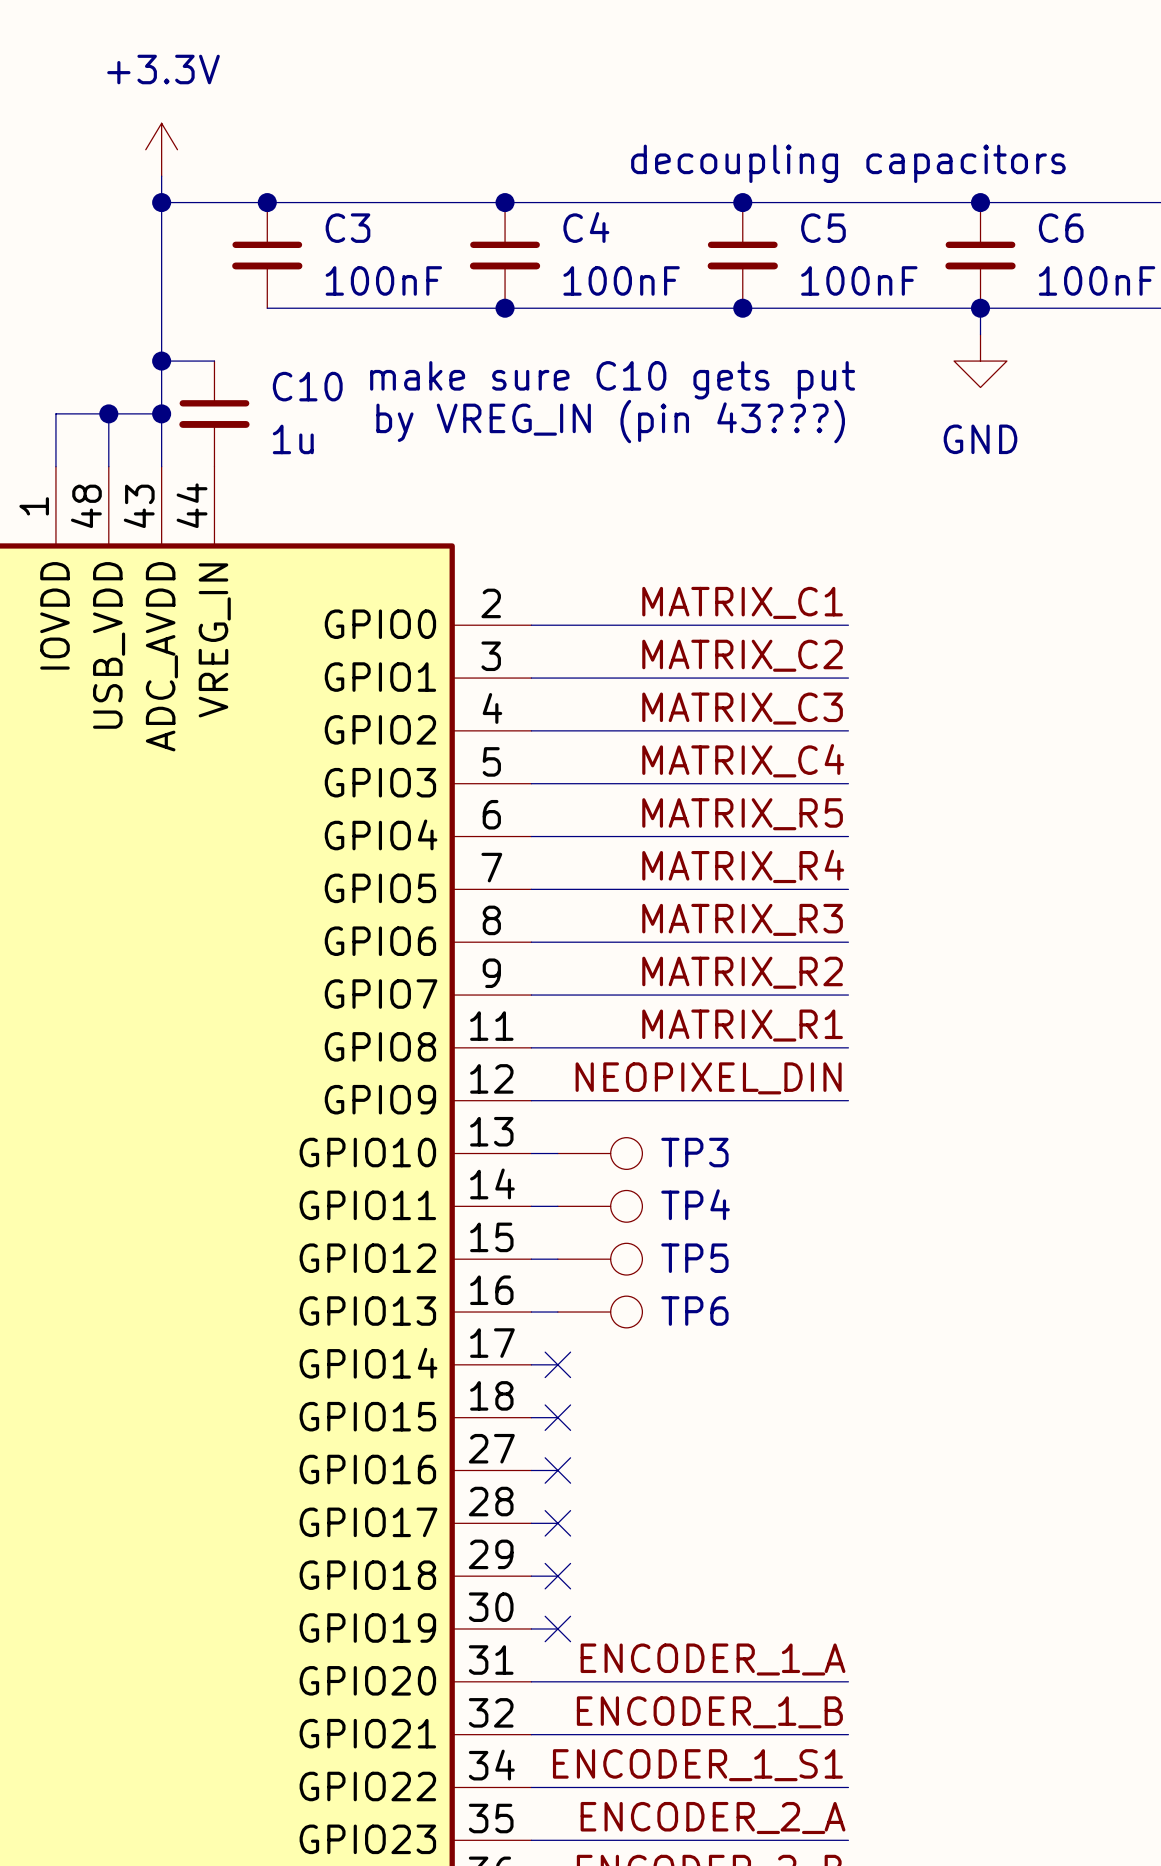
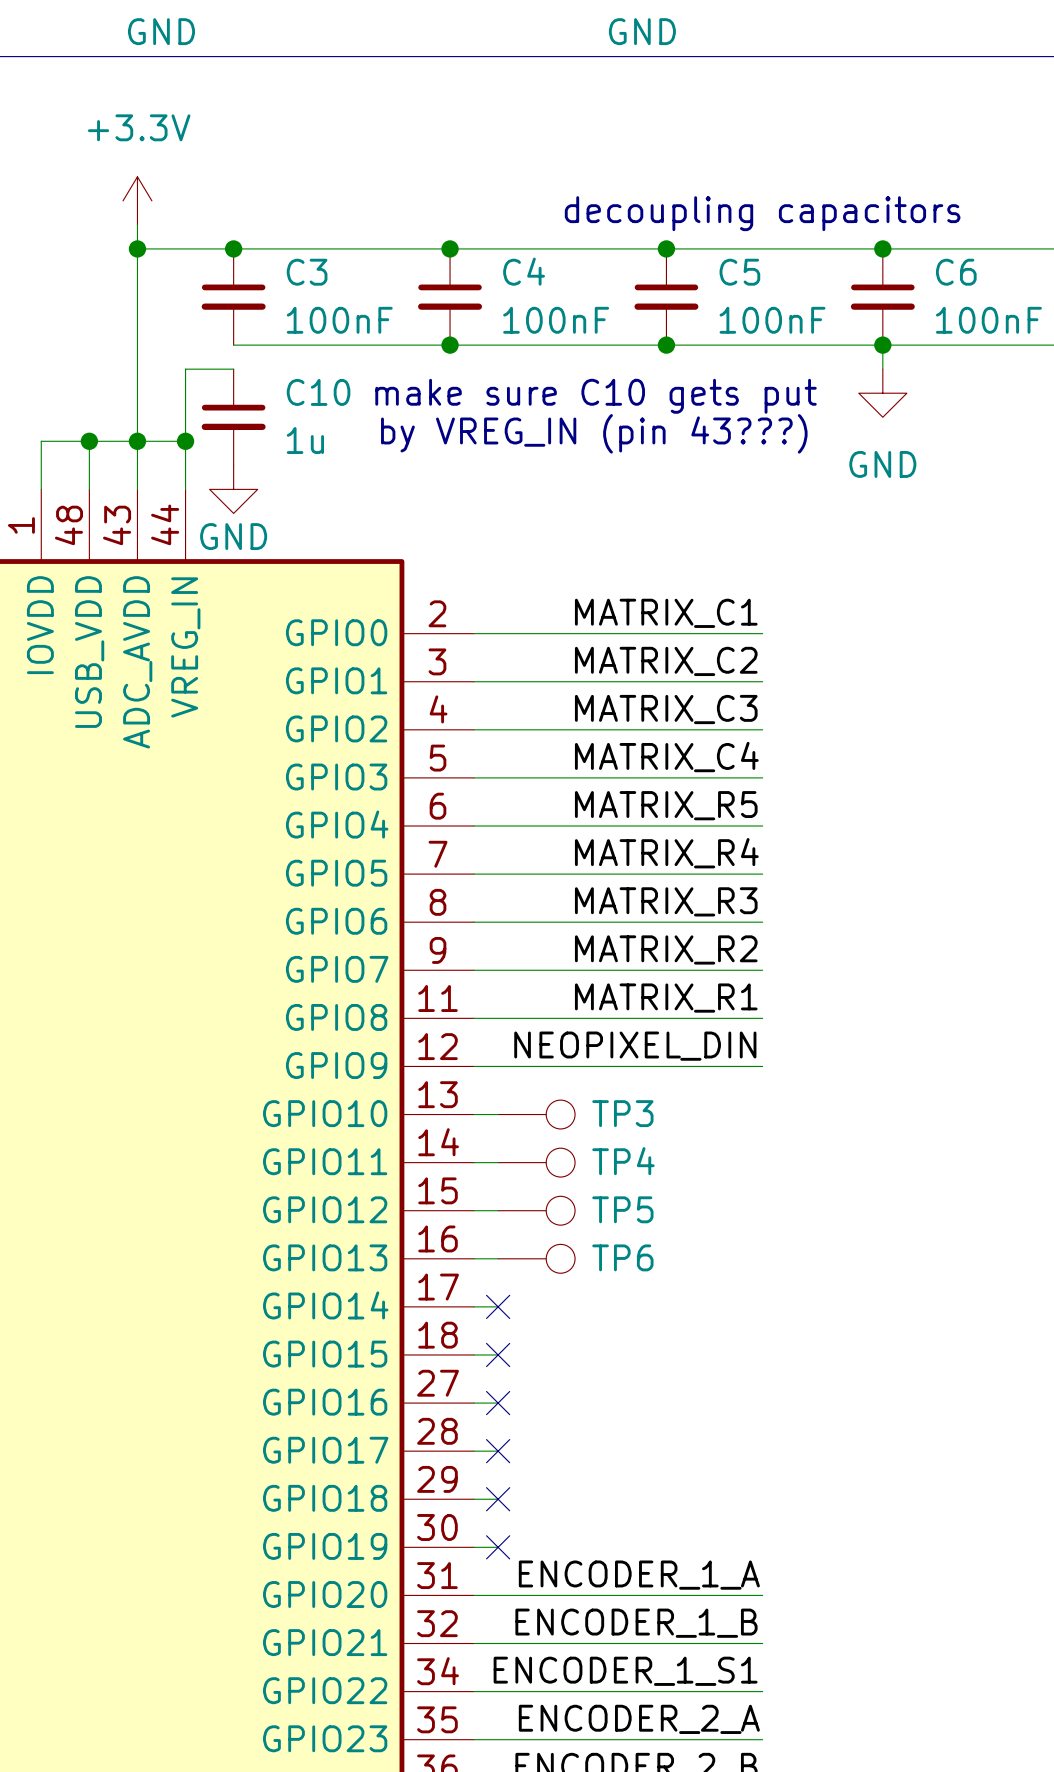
wire: none -> (233, 369) (185, 369) (185, 489)
wire: (161, 361) (214, 361) -> (137, 441) (185, 441)
junction position: (161, 361) -> (185, 441)
text position: make sure C10 gets put (612, 380) -> make sure C10 gets put (596, 396)
C10 position: (214, 413) -> (233, 417)
text position: by VREG_IN (pin 43???) (610, 421) -> by VREG_IN (pin 43???) (594, 433)
power symbol: none -> GND (233, 489)

